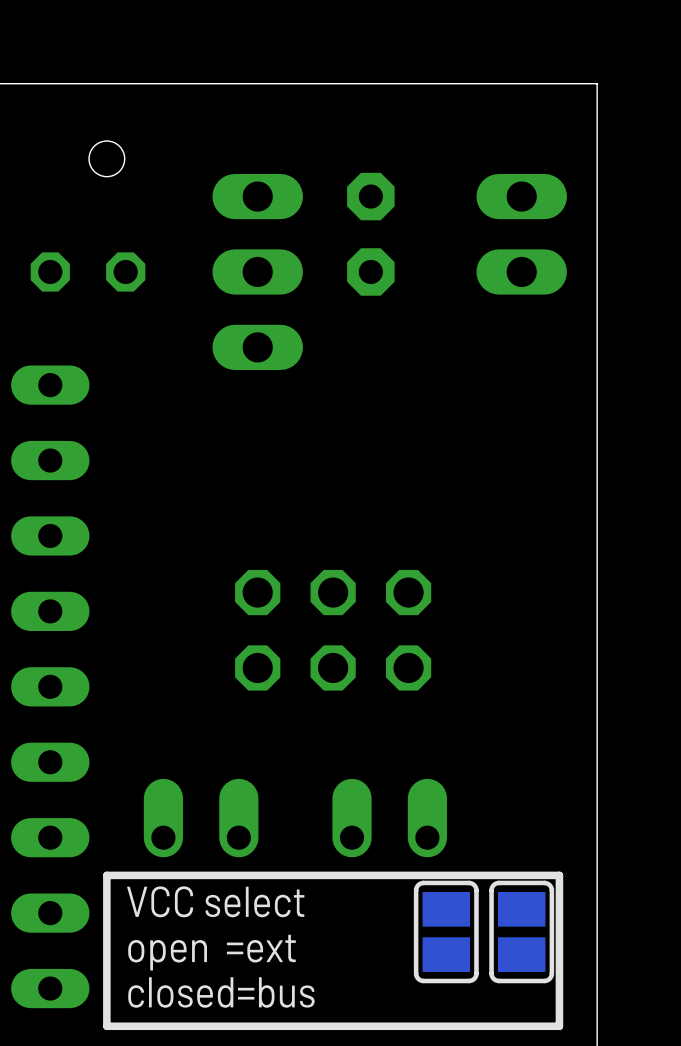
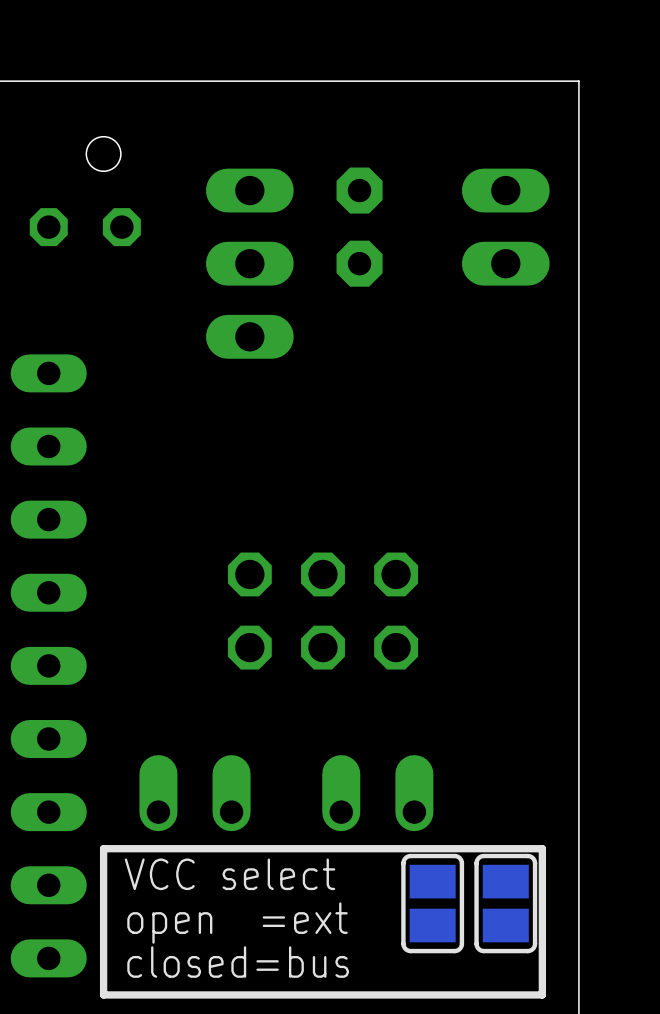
part position: (88, 271) -> (85, 227)

